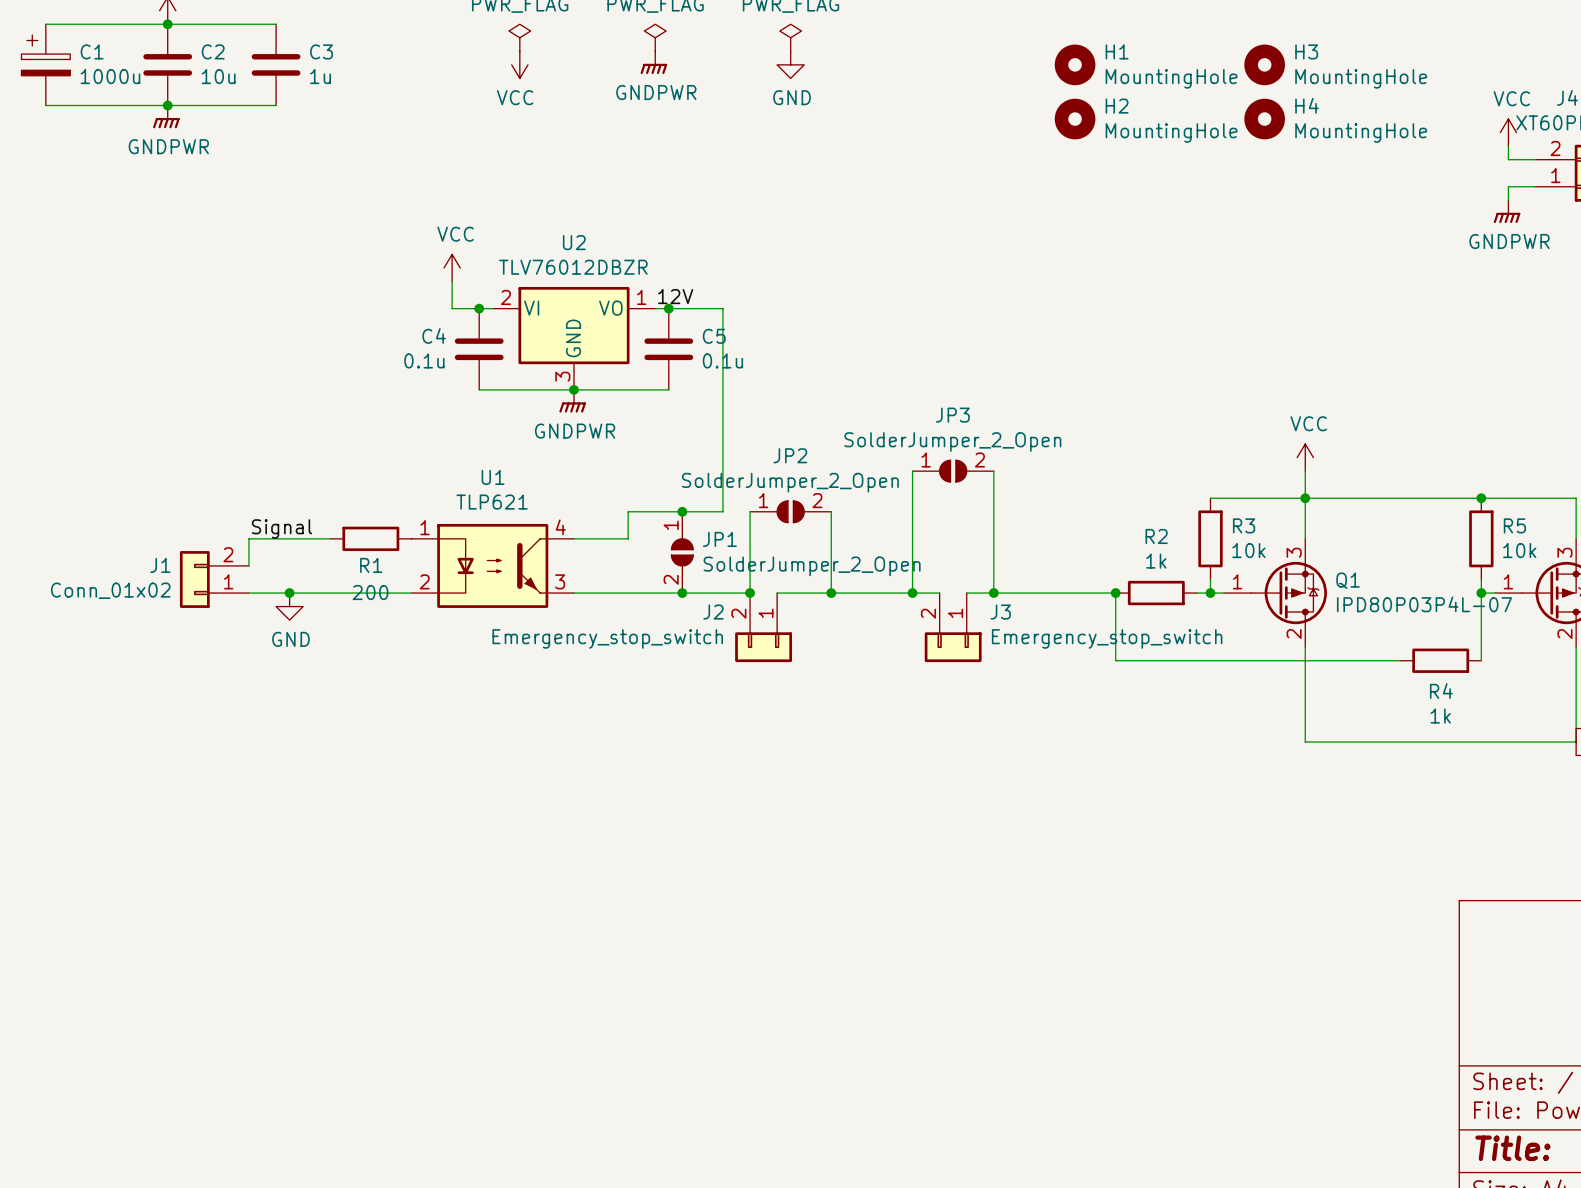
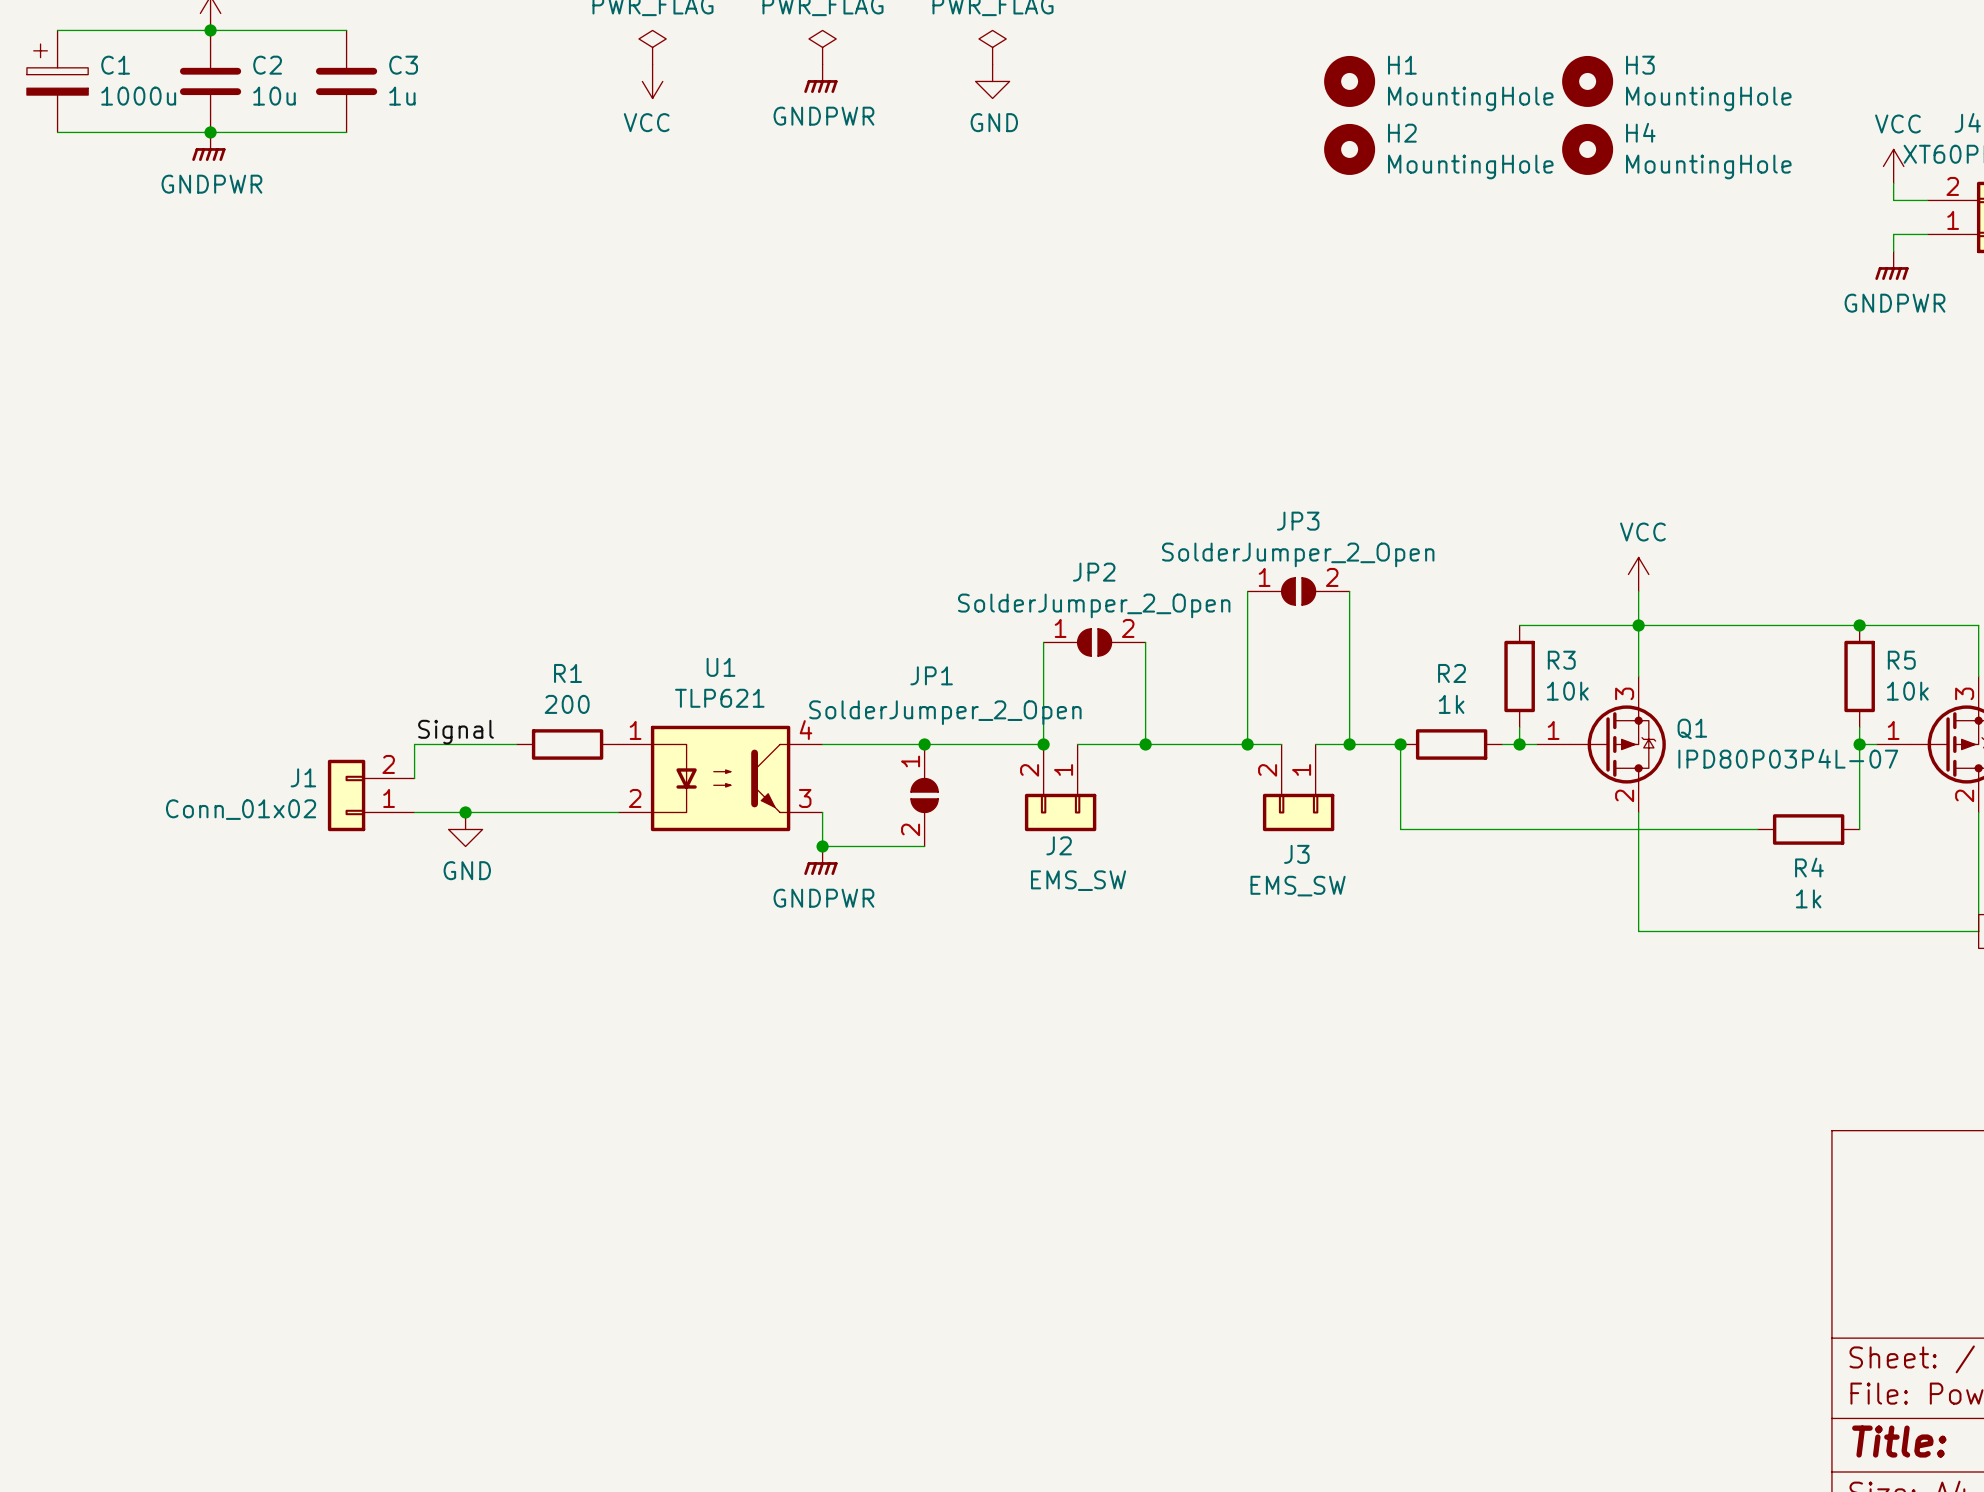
power symbol: VCC (452, 268) -> none
wire: (452, 281) (452, 308) (492, 308) -> none
label: 12V (675, 296) -> none
junction: (479, 308) -> none
wire: (655, 308) (722, 308) (722, 511) (628, 511) (628, 538) (574, 538) -> none
junction: (668, 308) -> none
U2: TLV76012DBZR (574, 338) -> none
C4: 0.1u (479, 349) -> none
C5: 0.1u (668, 349) -> none
wire: (479, 389) (668, 389) -> none
junction: (574, 389) -> none
power symbol: GNDPWR (572, 401) -> none
wire: (912, 471) (912, 511) -> none
JP3 position: (953, 471) -> (1298, 591)
wire: none -> (1349, 591) (1349, 744)
junction: (682, 511) -> none
wire: (750, 511) (750, 593) -> (975, 744) (941, 744)
JP2 position: (790, 511) -> (1094, 642)
label position: Signal (281, 529) -> Signal (455, 732)
wire: (330, 538) (248, 538) (248, 565) -> none
R1 position: (370, 538) -> (567, 744)
JP1 name position: JP1 (719, 539) -> JP1 (931, 675)
JP1 position: (682, 552) -> (924, 795)
R1 name position: R1 (371, 565) -> R1 (567, 673)
U1 position: (492, 565) -> (720, 778)
JP1 value position: SolderJumper_2_Open (812, 566) -> SolderJumper_2_Open (945, 712)
J1 position: (214, 579) -> (371, 795)
R1 value position: 200 (370, 592) -> 200 (567, 704)
wire: (248, 593) (330, 593) -> (414, 778) (414, 744)
junction: (289, 593) -> none
junction: (682, 593) -> none
junction position: (750, 593) -> (924, 744)
wire: (831, 593) (858, 593) -> none
wire: (1020, 593) (1047, 593) -> (1179, 744) (1213, 744)
junction: none -> (1349, 744)
power symbol position: GND (289, 606) -> GND (465, 829)
J2 name position: J2 (713, 612) -> J2 (1059, 845)
J3 name position: J3 (1000, 612) -> J3 (1296, 854)
J2 position: (763, 627) -> (1060, 787)
J3 position: (953, 627) -> (1298, 787)
J2 value: Emergency_stop_switch (607, 638) -> EMS_SW (1078, 880)
J3 value: Emergency_stop_switch (1107, 638) -> EMS_SW (1298, 886)
wire: none -> (414, 812) (618, 812)
junction: none -> (465, 812)
wire: none -> (822, 812) (822, 846) (924, 846)
junction: none -> (822, 846)
power symbol: none -> GNDPWR (820, 860)

